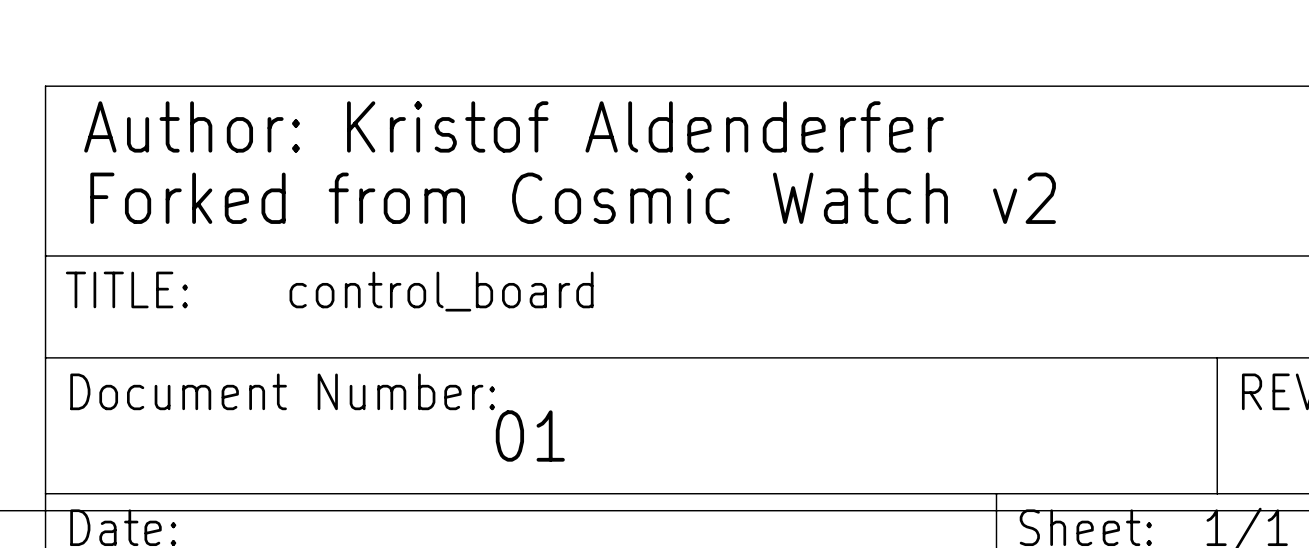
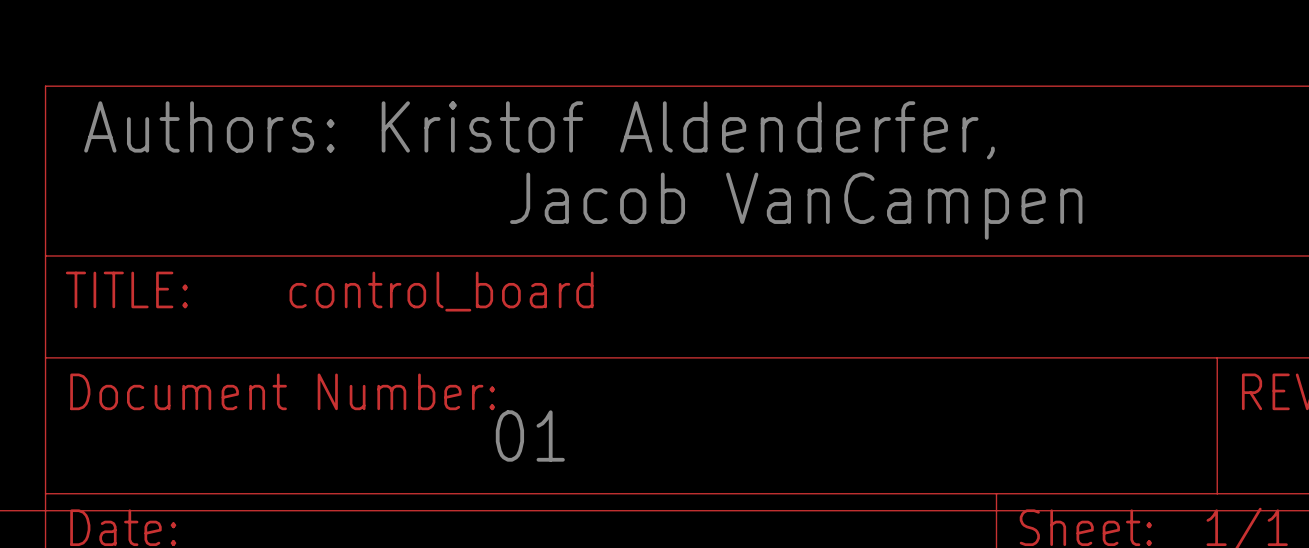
text: Author: Kristof Aldenderfer (514, 126) -> Authors: Kristof Aldenderfer, (539, 130)
text: Forked from Cosmic Watch v2 (573, 198) -> Jacob VanCampen (796, 206)

